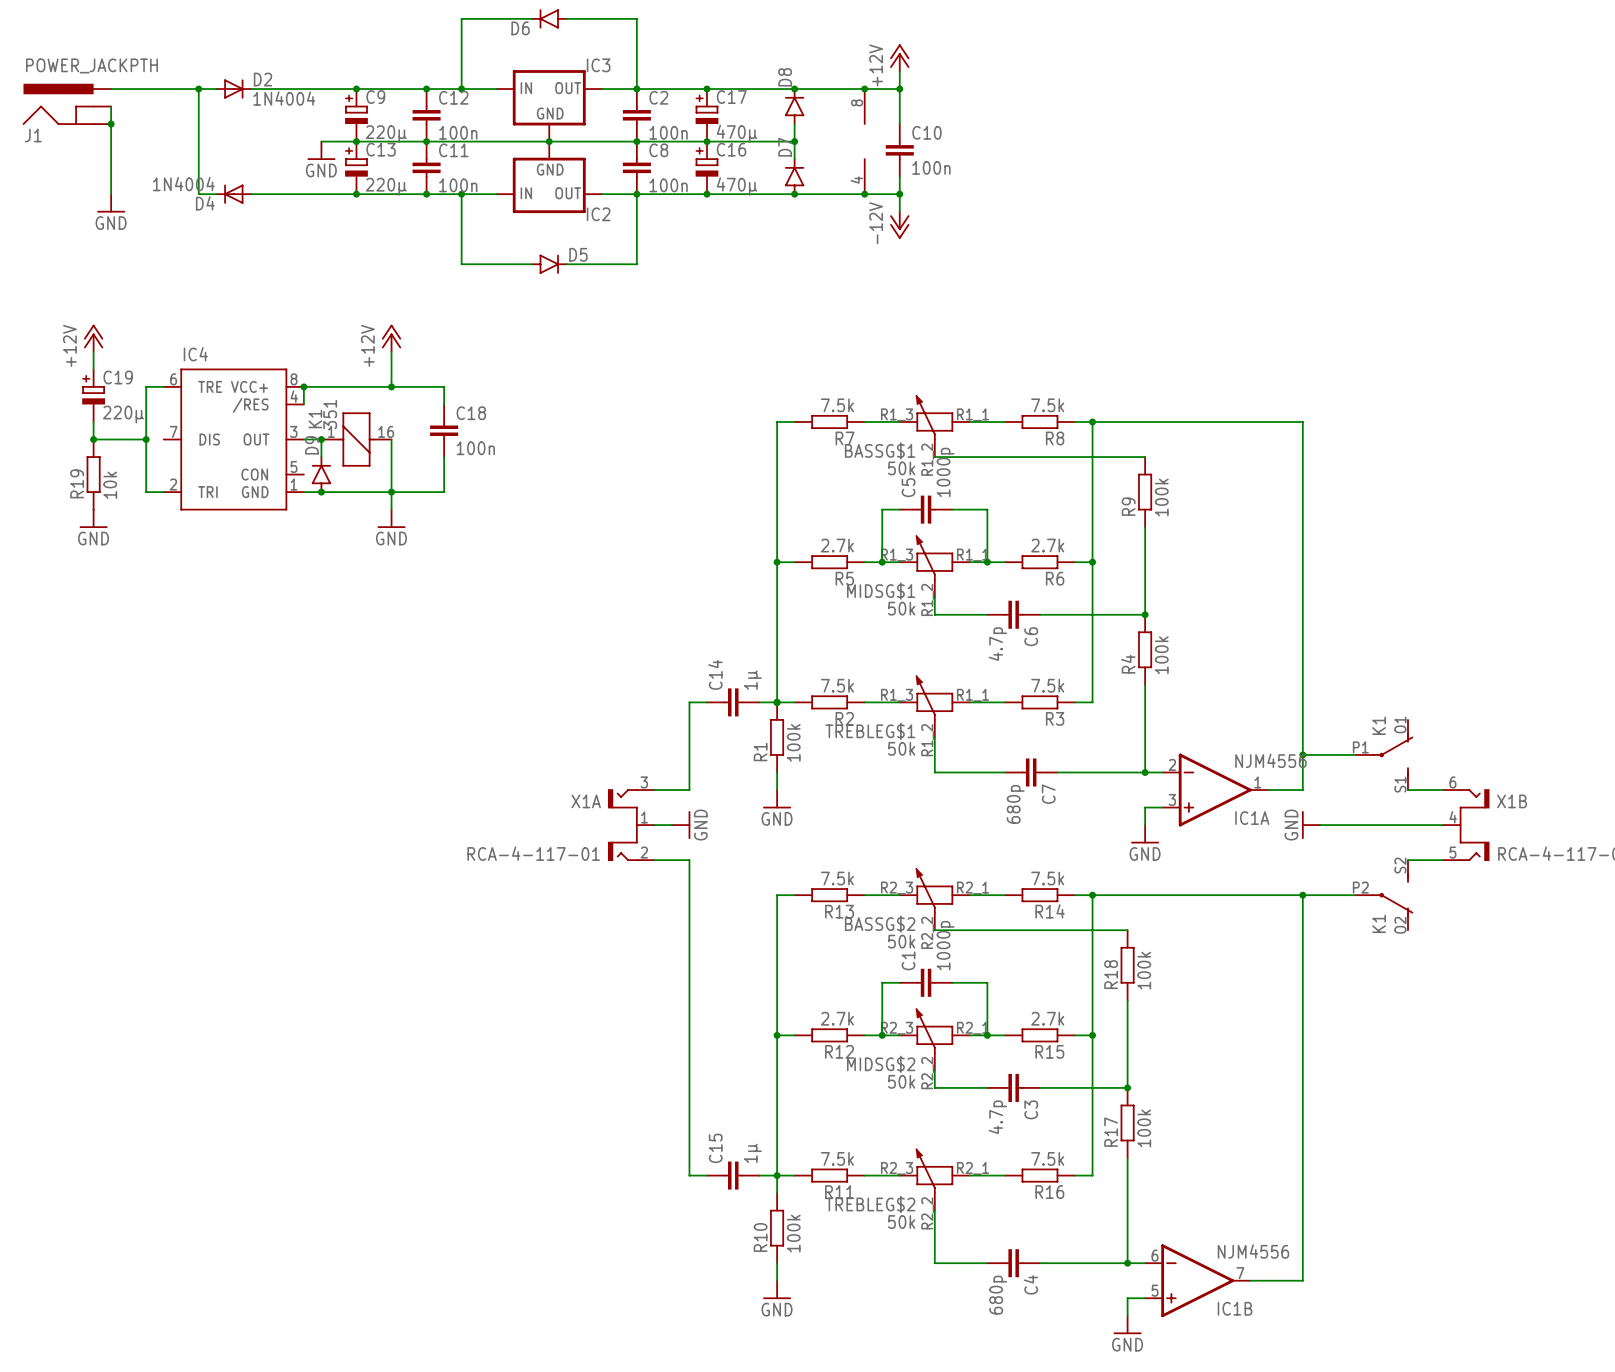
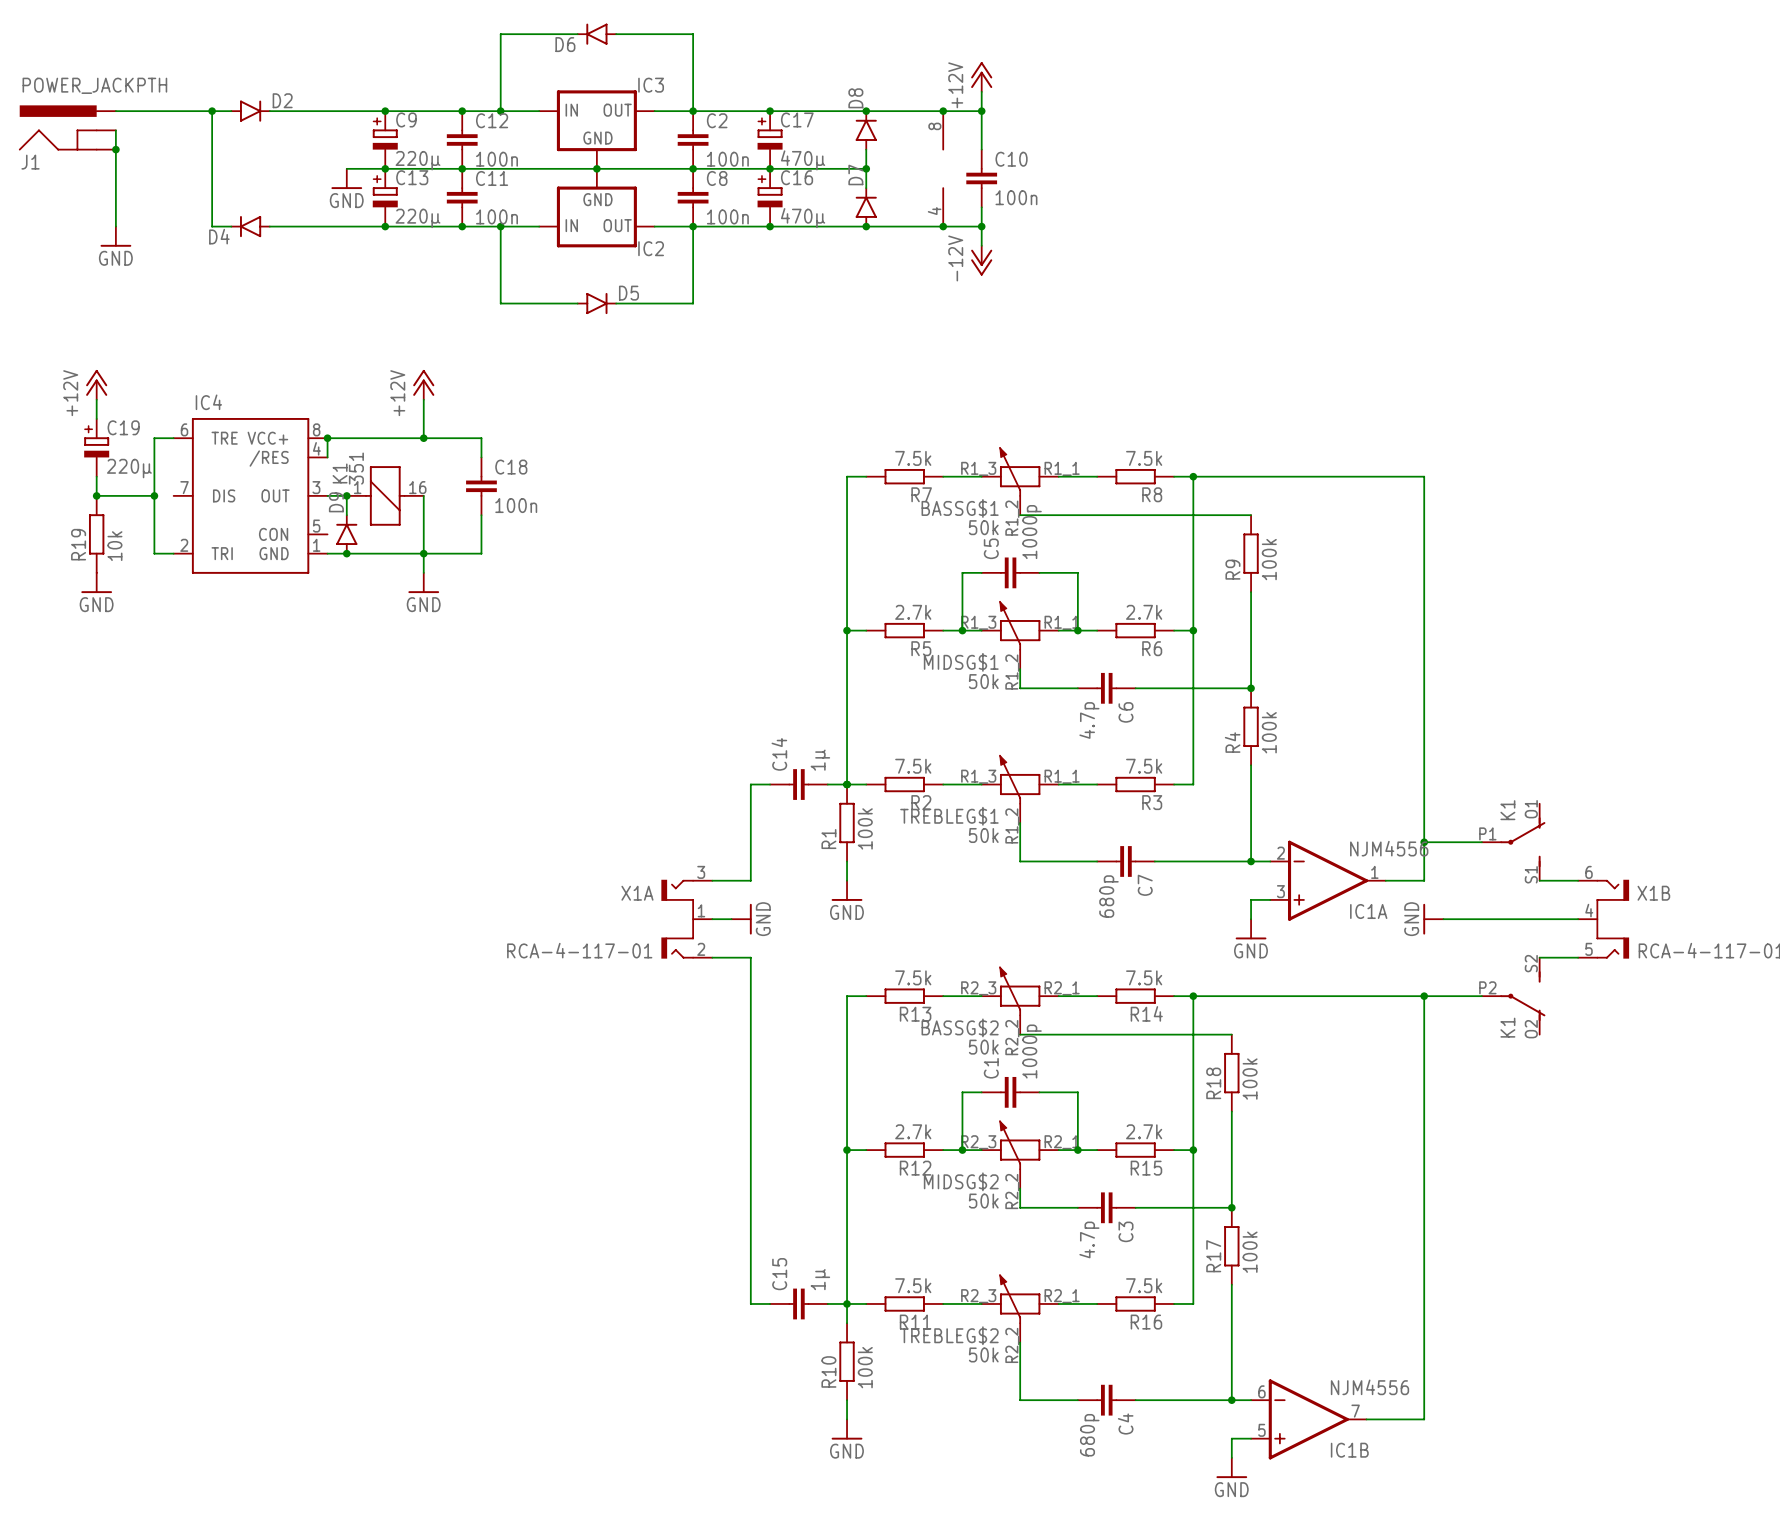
D2 symbol: [216, 79, 252, 99] -> [230, 100, 271, 122]
D2 value: 1N4004 (284, 98) -> none
D4 value: 1N4004 (183, 184) -> none
D4 symbol: [216, 184, 252, 204] -> [230, 215, 271, 238]

